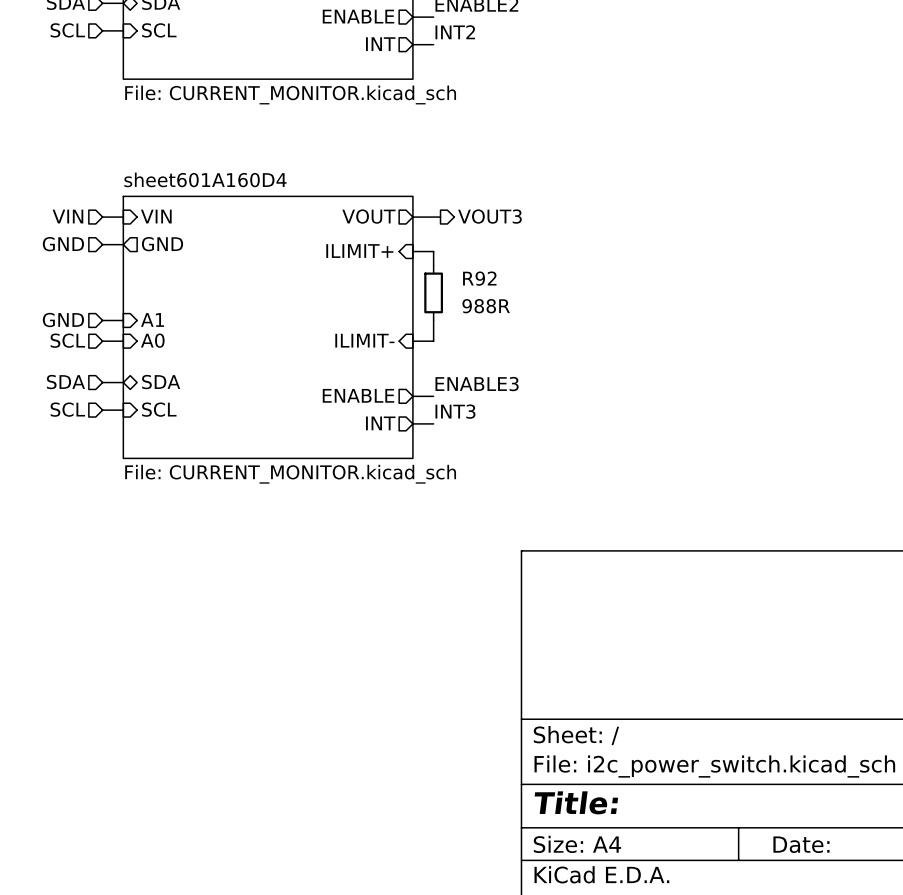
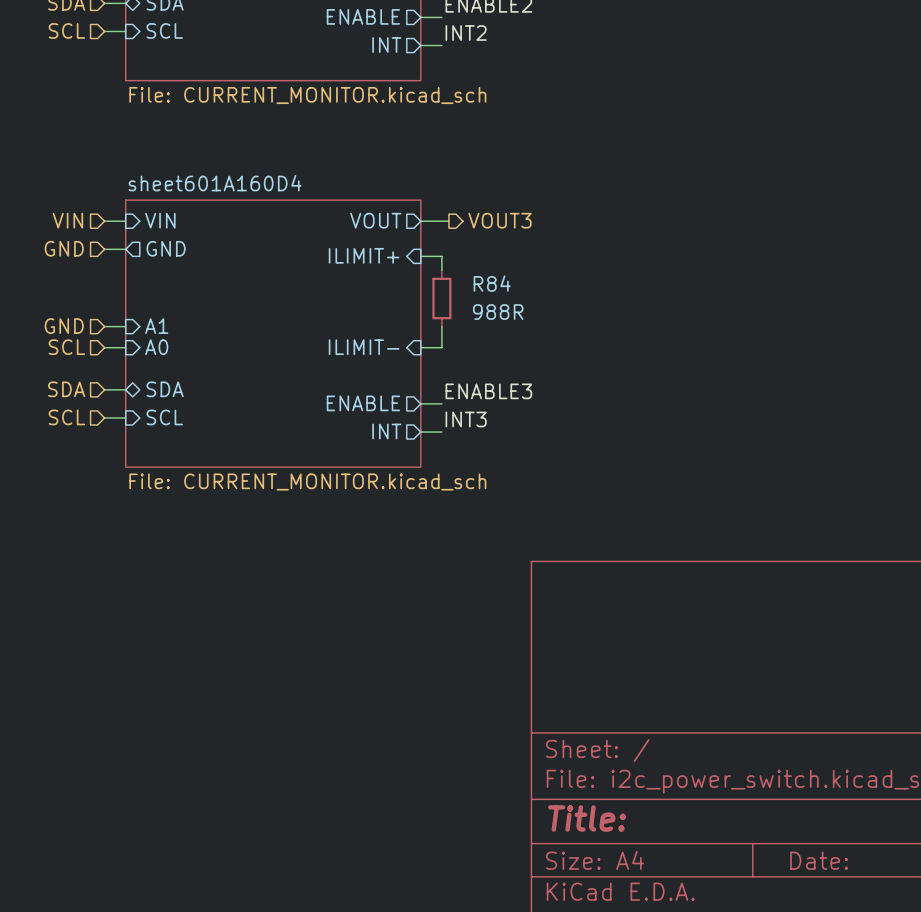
R92 name: R92 (479, 278) -> R84 (492, 283)

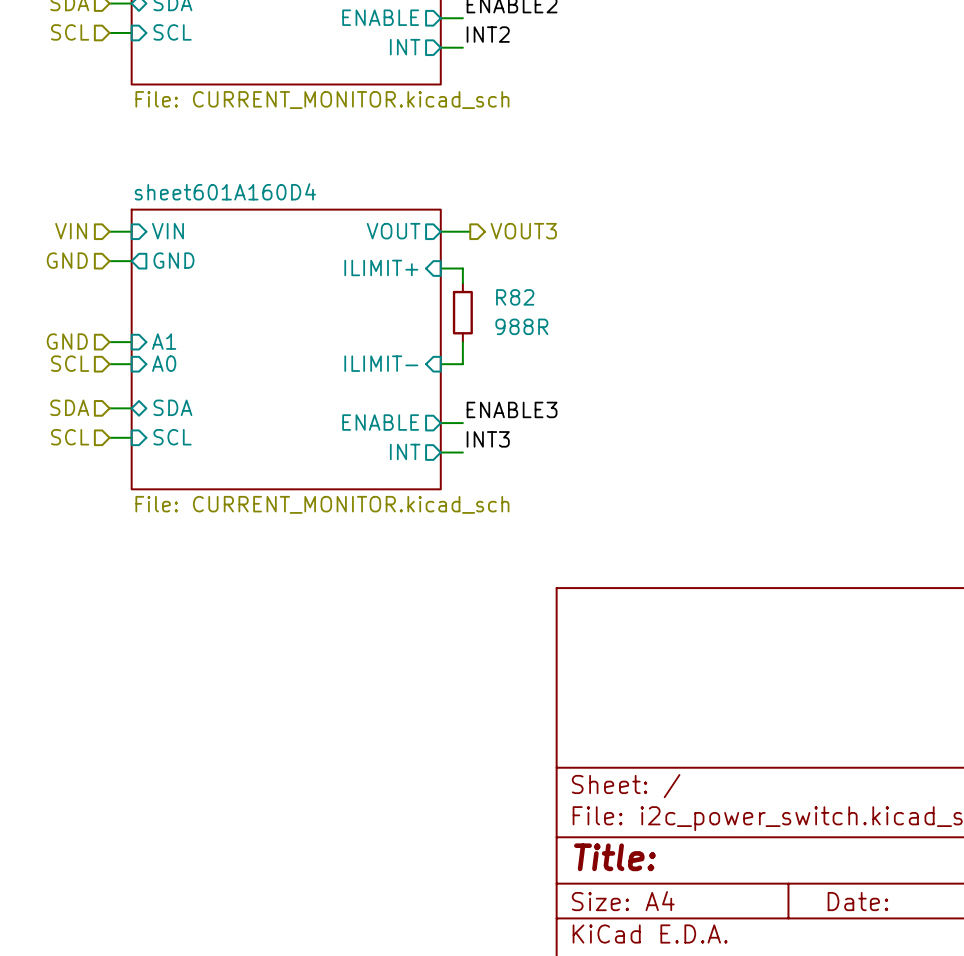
R84 name: R84 (492, 283) -> R82 (515, 297)

